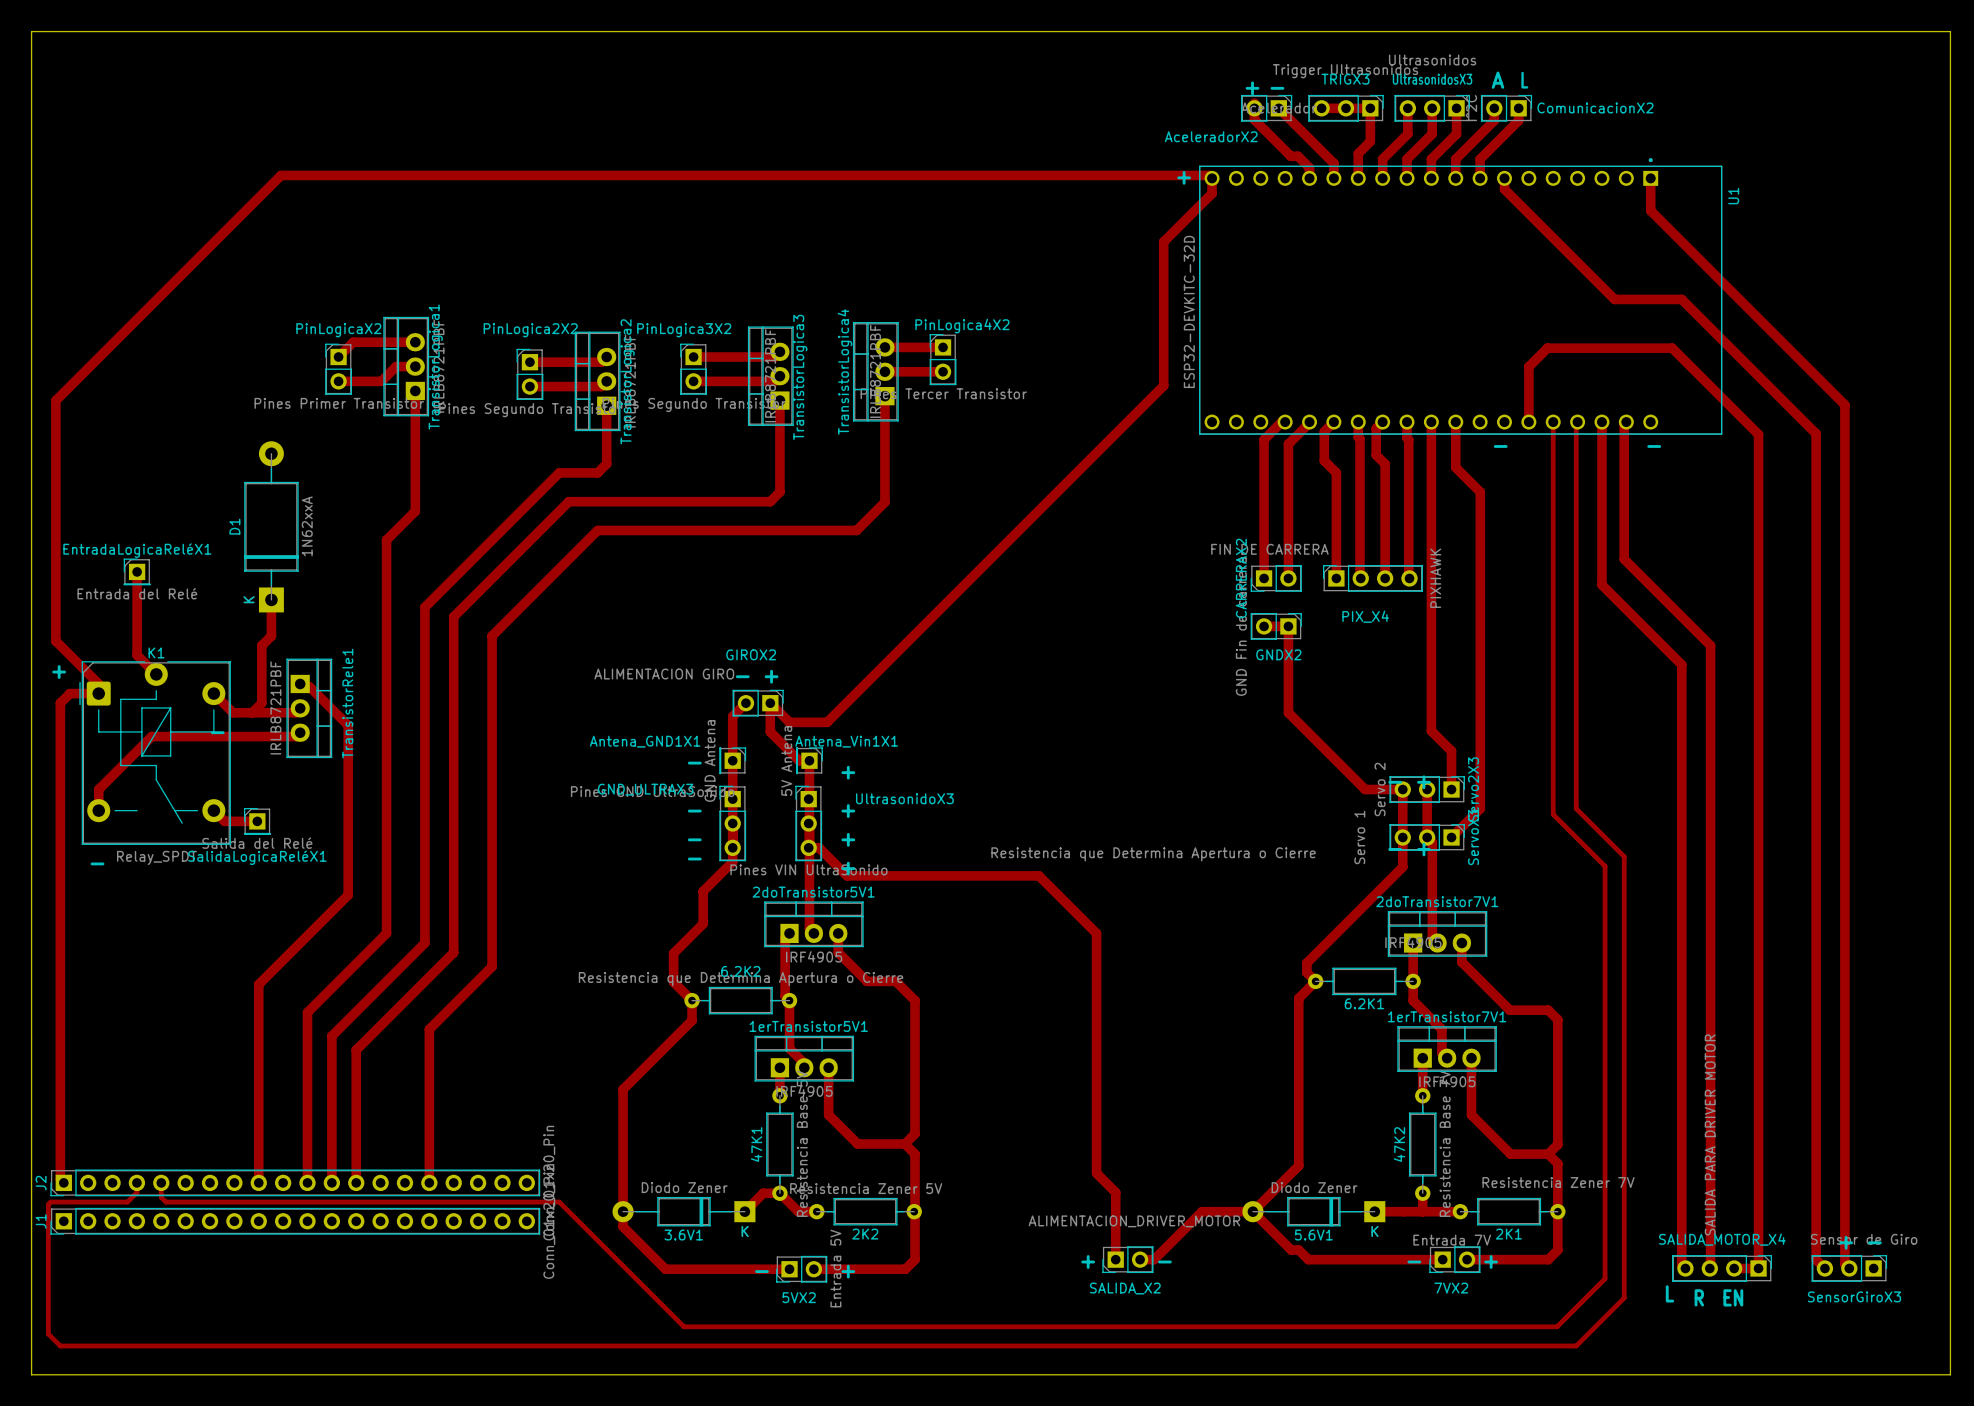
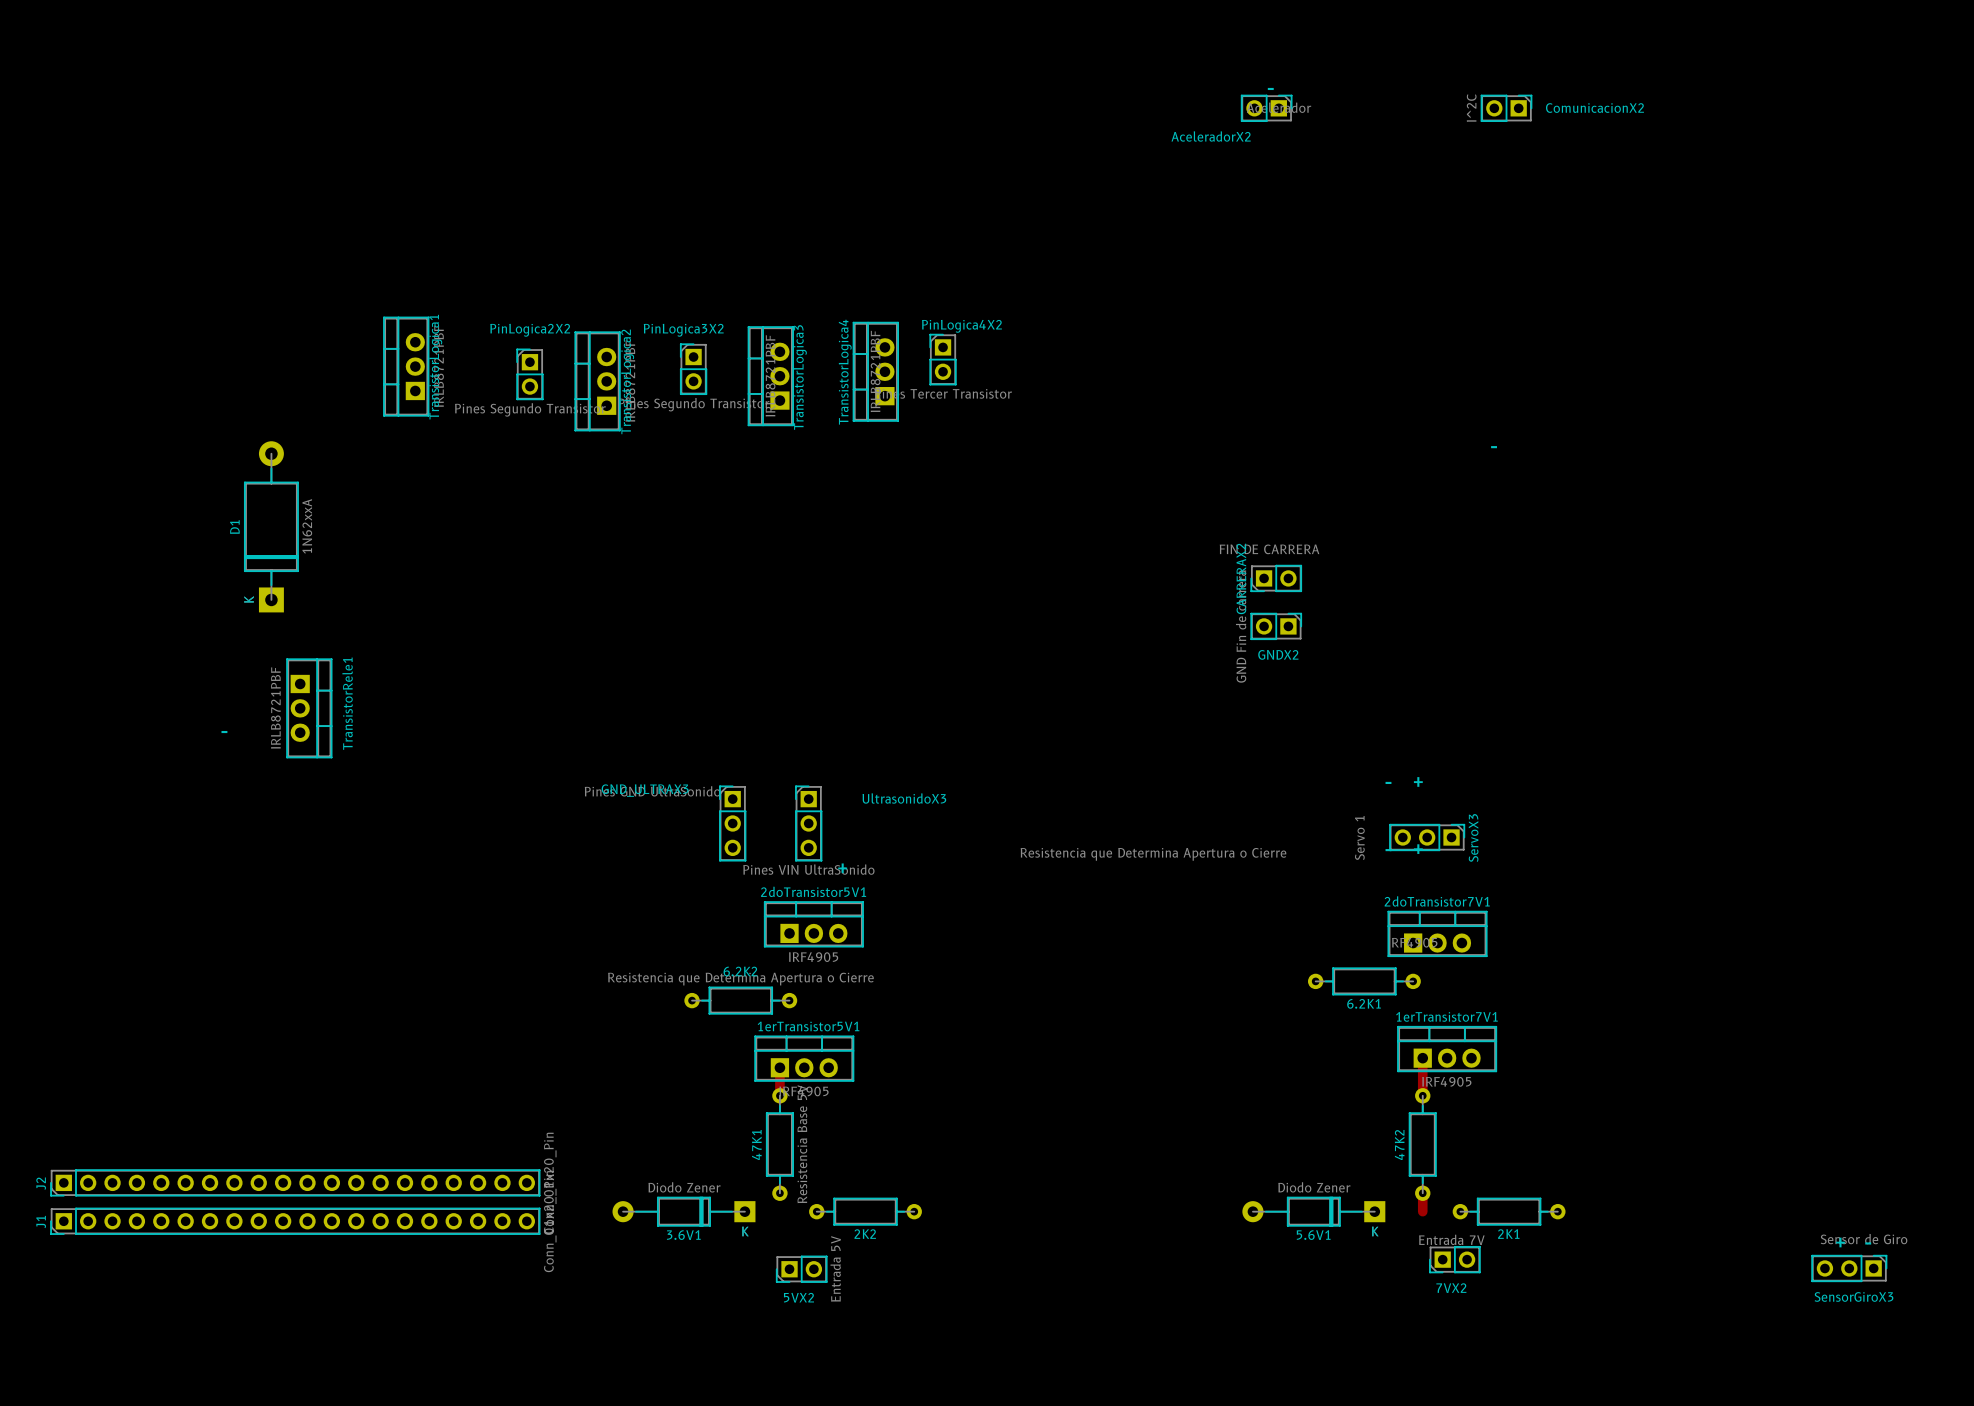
board edge: (31, 31) (1950, 31) (1950, 1374) (31, 1374) (31, 31) -> none
text: A (1497, 80) -> none
text: L (1524, 80) -> none
text: + (1252, 88) -> none
top track: (1254, 103) (1254, 119) (1290, 156) (1298, 156) (1309, 167) (1309, 178) -> none
top track: (1278, 108) (1333, 163) (1333, 178) -> none
top track: (1321, 108) (1370, 108) (1370, 141) (1358, 153) (1358, 178) -> none
TRIGX3: Trigger Ultrasonidos (1345, 108) -> none
top track: (1407, 108) (1407, 133) (1382, 159) (1382, 178) -> none
top track: (1432, 108) (1432, 133) (1407, 159) (1407, 178) -> none
UltrasonidosX3: Ultrasonidos (1432, 108) -> none
top track: (1456, 108) (1456, 133) (1431, 159) (1431, 178) -> none
top track: (1494, 108) (1494, 120) (1455, 159) (1455, 178) -> none
top track: (1518, 108) (1518, 120) (1480, 159) (1480, 178) -> none
text: + (1184, 177) -> none
top track: (1504, 178) (1504, 189) (1614, 299) (1681, 299) (1816, 433) (1816, 1259) (1824, 1268) -> none
top track: (1650, 178) (1650, 210) (1844, 404) (1844, 1264) (1849, 1268) -> none
U1: ESP32-DEVKITC-32D (1460, 296) -> none
top track: (415, 342) (353, 342) (338, 357) -> none
top track: (884, 347) (943, 347) -> none
top track: (779, 351) (774, 357) (693, 357) -> none
top track: (606, 357) (601, 362) (529, 362) -> none
top track: (415, 366) (396, 366) (381, 381) (338, 381) -> none
PinLogicaX2: Pines Primer Transistor (338, 369) -> none
top track: (884, 371) (943, 371) -> none
top track: (779, 376) (774, 381) (693, 381) -> none
top track: (606, 381) (601, 386) (529, 386) -> none
top track: (415, 390) (415, 511) (386, 540) (386, 933) (307, 1012) (307, 1182) -> none
top track: (884, 396) (884, 502) (856, 530) (597, 530) (492, 636) (492, 966) (429, 1029) (429, 1182) -> none
top track: (779, 400) (779, 492) (770, 501) (568, 501) (453, 616) (453, 952) (356, 1050) (356, 1182) -> none
top track: (606, 405) (606, 463) (597, 472) (559, 472) (424, 607) (424, 943) (331, 1036) (331, 1182) -> none
top track: (1285, 422) (1281, 422) (1264, 439) (1264, 578) -> none
top track: (1309, 422) (1288, 444) (1288, 578) -> none
top track: (1333, 422) (1324, 431) (1324, 460) (1336, 472) (1336, 578) -> none
top track: (1358, 422) (1360, 578) -> none
top track: (1382, 422) (1376, 428) (1376, 455) (1385, 464) (1385, 578) -> none
top track: (1407, 422) (1409, 578) -> none
top track: (1431, 422) (1431, 731) (1451, 751) (1451, 789) -> none
top track: (1455, 422) (1455, 467) (1480, 492) (1480, 808) (1451, 837) -> none
top track: (1528, 422) (1528, 366) (1547, 348) (1672, 348) (1758, 434) (1758, 1268) (1734, 1268) -> none
top track: (1553, 422) (1553, 814) (1605, 866) (1605, 1278) (1557, 1326) (683, 1326) (559, 1202) (165, 1202) (161, 1197) (161, 1182) -> none
top track: (1577, 422) (1576, 808) (1624, 856) (1624, 1298) (1576, 1345) (60, 1345) (48, 1334) (48, 1204) (50, 1202) (127, 1202) (136, 1192) (136, 1182) -> none
top track: (1601, 422) (1601, 584) (1681, 664) (1681, 1264) (1685, 1268) -> none
top track: (1626, 422) (1624, 424) (1624, 559) (1710, 645) (1709, 1268) -> none
text: - (1654, 446) -> none
top track: (137, 571) (137, 655) (156, 674) -> none
EntradaLogicaReléX1: Entrada del Relé (137, 571) -> none
PIX_X4: PIXHAWK (1372, 578) -> none
top track: (271, 599) (271, 636) (261, 645) (261, 703) (252, 712) -> none
top track: (1264, 626) (1288, 626) (1288, 712) (1365, 789) (1402, 789) (1402, 867) (1306, 962) (1306, 972) (1315, 981) (1298, 998) (1298, 1165) (1252, 1211) -> none
text: + (59, 672) -> none
text: - (742, 676) -> none
text: + (771, 676) -> none
top track: (300, 683) (303, 687) (309, 687) (348, 725) (348, 895) (258, 984) (258, 1182) -> none
top track: (213, 693) (233, 712) (295, 712) (300, 708) -> none
top track: (745, 703) (732, 716) (732, 861) (703, 891) (703, 923) (673, 953) (673, 982) (692, 1000) (692, 1020) (623, 1089) (623, 1226) (665, 1269) (789, 1269) -> none
GIROX2: ALIMENTACION GIRO (758, 703) -> none
top track: (300, 732) (296, 736) (151, 736) (98, 789) (98, 810) -> none
K1: Relay_SPDT (155, 753) -> none
Antena_GND1X1: GND Antena (732, 760) -> none
Antena_Vin1X1: 5V Antena (809, 760) -> none
text: - (694, 763) -> none
text: + (848, 772) -> none
top track: (1427, 789) (1427, 837) (1432, 842) (1432, 937) (1437, 943) -> none
Servo2X3: Servo 2 (1427, 789) -> none
top track: (213, 810) (224, 821) (257, 821) -> none
text: - (694, 811) -> none
text: + (848, 811) -> none
SalidaLogicaReléX1: Salida del Relé (257, 821) -> none
text: - (694, 839) -> none
text: + (848, 839) -> none
top track: (808, 847) (819, 847) (847, 875) (1038, 875) (1096, 933) (1096, 1173) (1115, 1192) (1115, 1259) -> none
top track: (808, 847) (809, 760) (799, 760) (770, 731) (770, 703) (789, 722) (827, 722) (1163, 385) (1163, 241) (1212, 193) (1212, 178) (1209, 175) (281, 175) (55, 400) (55, 641) (98, 683) (98, 693) (69, 693) (60, 703) (60, 1179) (63, 1182) -> none
top track: (808, 847) (809, 929) (813, 933) -> none
text: - (694, 859) -> none
text: - (97, 863) -> none
top track: (789, 933) (785, 937) (785, 996) (789, 1000) (789, 1048) (804, 1063) (804, 1067) -> none
top track: (838, 933) (838, 952) (867, 981) (895, 981) (915, 1000) (915, 1133) (904, 1143) -> none
top track: (1413, 943) (1413, 1000) (1441, 1029) (1441, 1052) (1447, 1058) -> none
top track: (1461, 943) (1461, 962) (1509, 1010) (1548, 1010) (1557, 1019) (1557, 1144) (1548, 1154) -> none
top track: (1471, 1058) (1471, 1114) (1510, 1154) (1548, 1154) -> none
top track: (828, 1067) (828, 1114) (857, 1143) (904, 1143) -> none
top track: (904, 1143) (915, 1154) (915, 1259) (905, 1269) (813, 1269) -> none
47K2 value: Resistencia Base 7V (1445, 1143) -> none
top track: (1548, 1154) (1557, 1163) (1557, 1250) (1548, 1259) (1467, 1259) -> none
2K1 value: Resistencia Zener 7V (1558, 1182) -> none
2K2 value: Resistencia Zener 5V (866, 1188) -> none
top track: (744, 1211) (763, 1193) (779, 1193) (798, 1211) (816, 1211) -> none
top track: (1252, 1211) (1291, 1250) (1298, 1250) (1308, 1259) (1442, 1259) -> none
top track: (1252, 1211) (1202, 1211) (1154, 1259) (1140, 1259) -> none
top track: (1374, 1211) (1460, 1211) -> none
SALIDA_X2: ALIMENTACION_DRIVER_MOTOR (1127, 1259) -> none
text: + (1088, 1262) -> none
text: - (1164, 1262) -> none
text: - (1414, 1262) -> none
text: + (1491, 1262) -> none
SALIDA_MOTOR_X4: SALIDA PARA DRIVER MOTOR (1722, 1268) -> none
text: - (761, 1271) -> none
text: + (848, 1271) -> none
text: L (1669, 1293) -> none
text: R (1699, 1297) -> none
text: EN (1733, 1297) -> none

